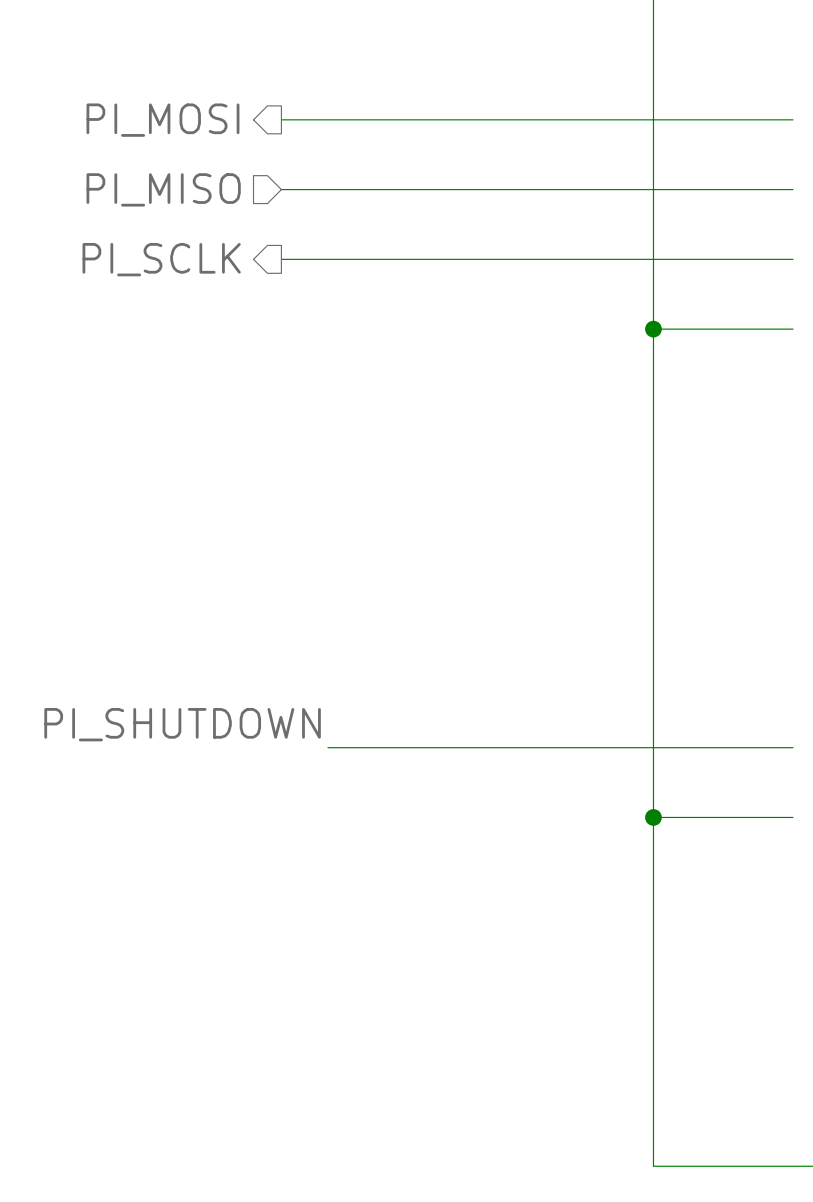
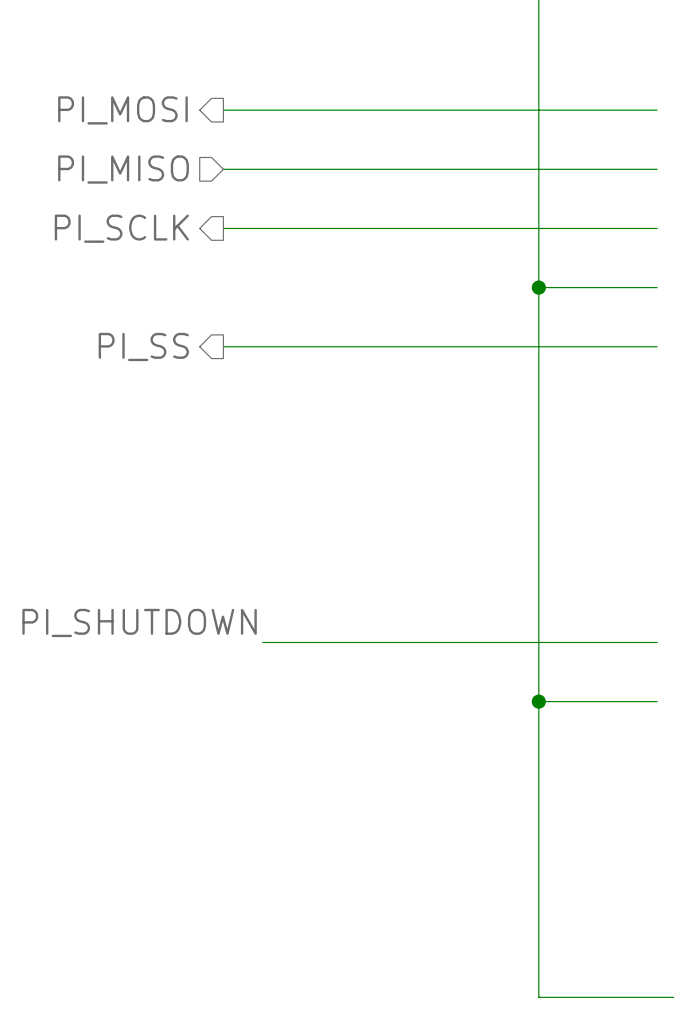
wire: none -> (223, 346) (657, 346)
hierarchical label: none -> PI_SS (143, 346)

